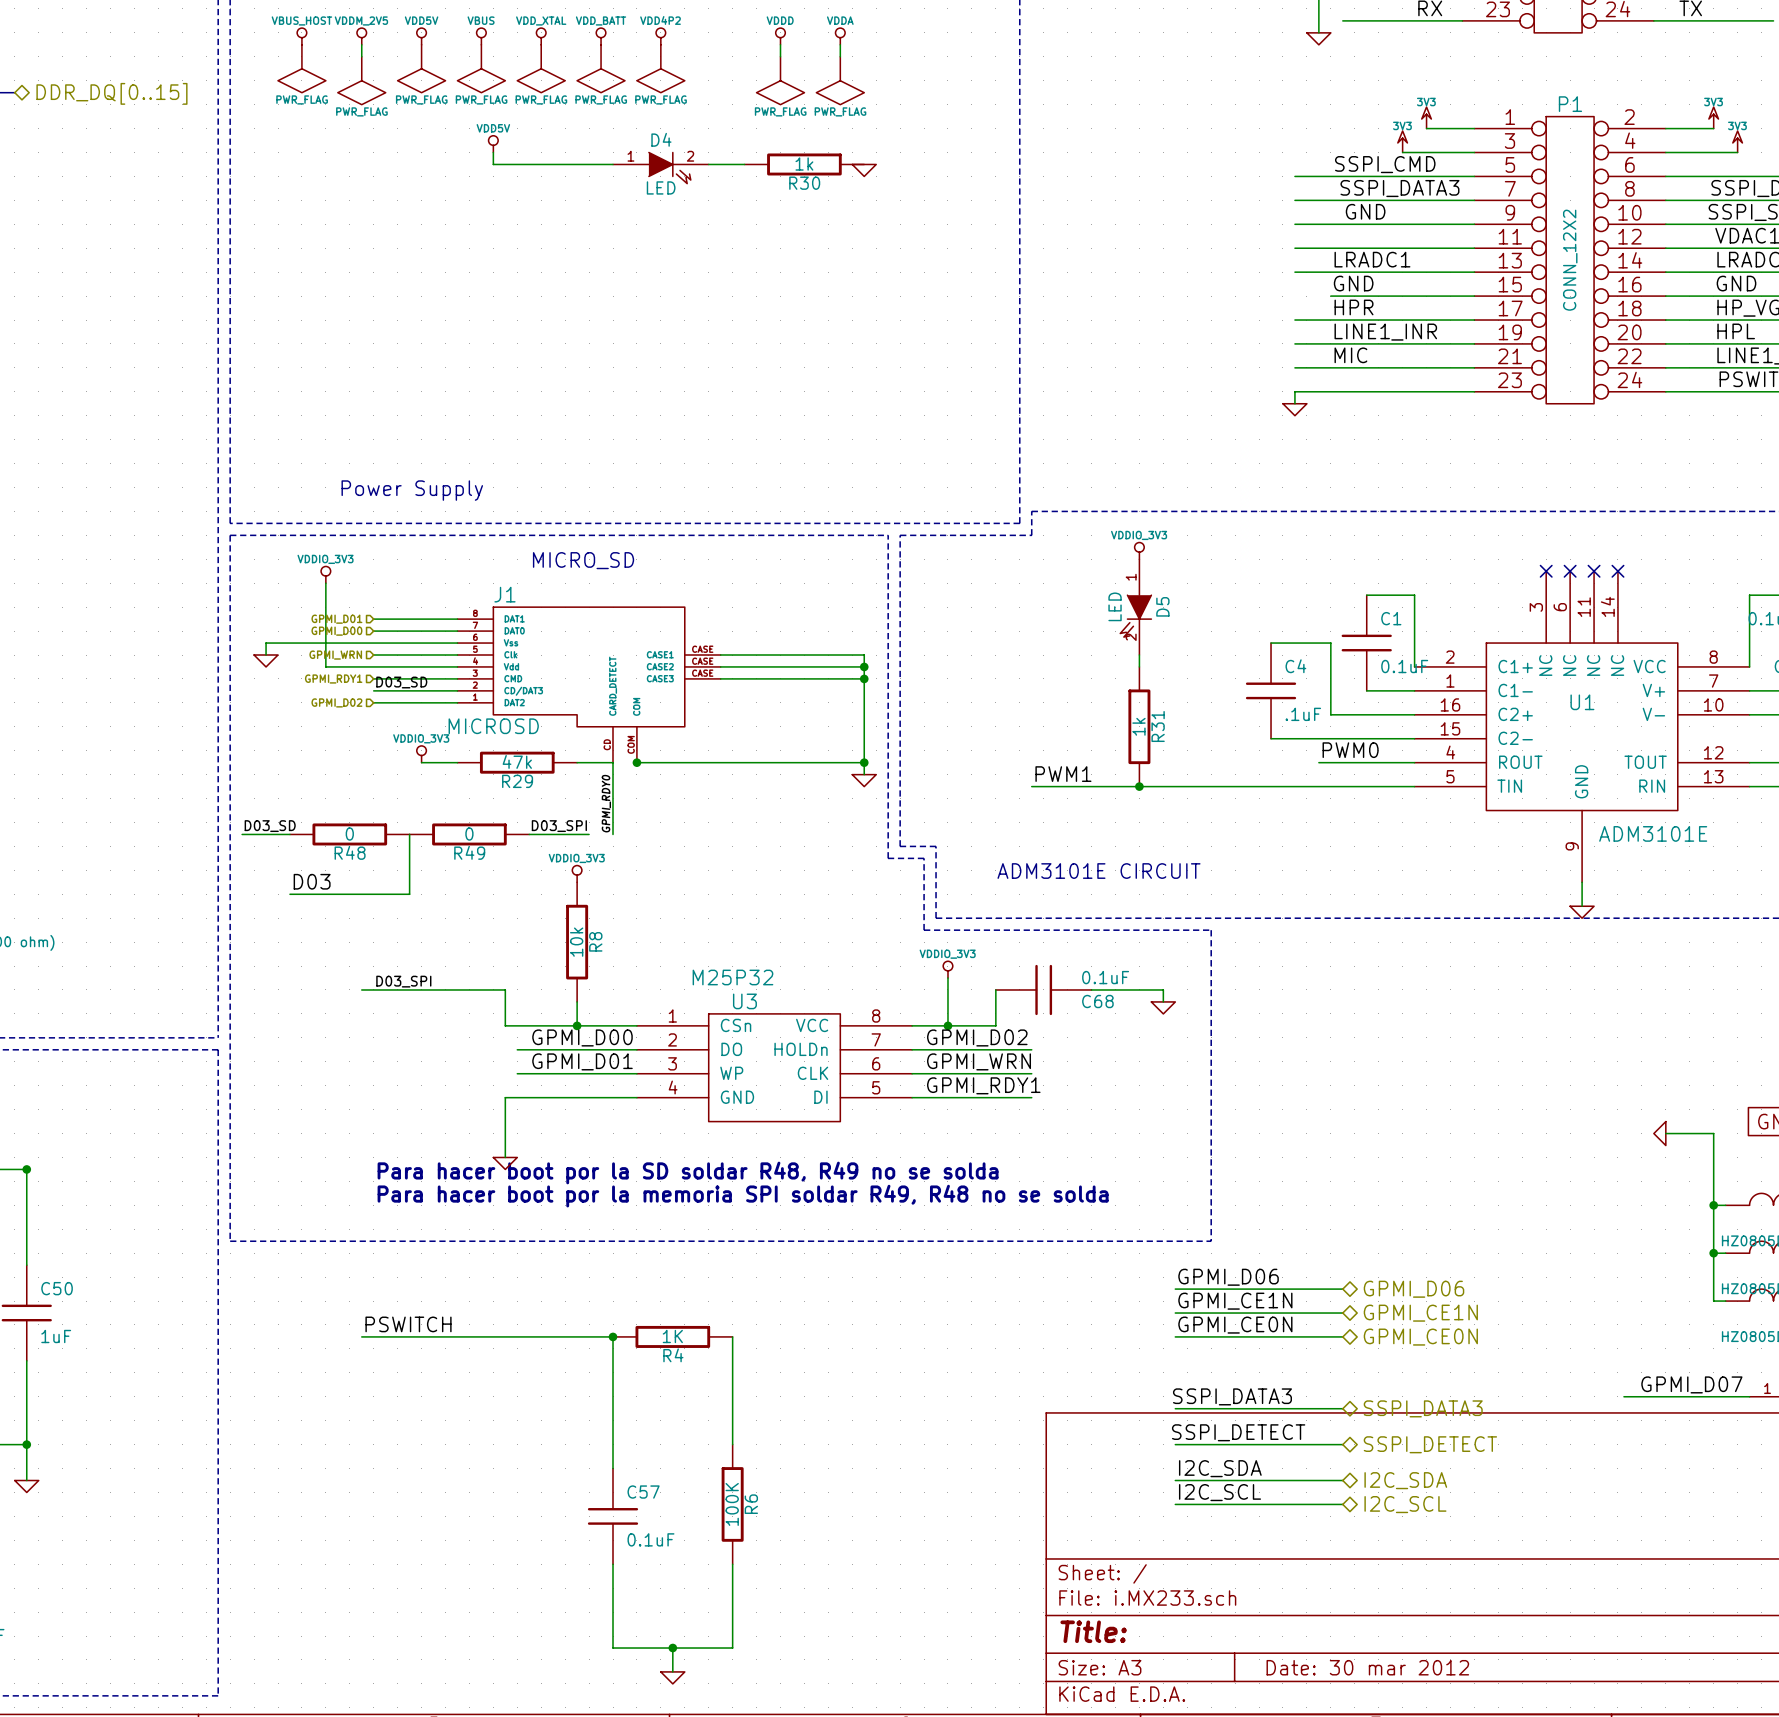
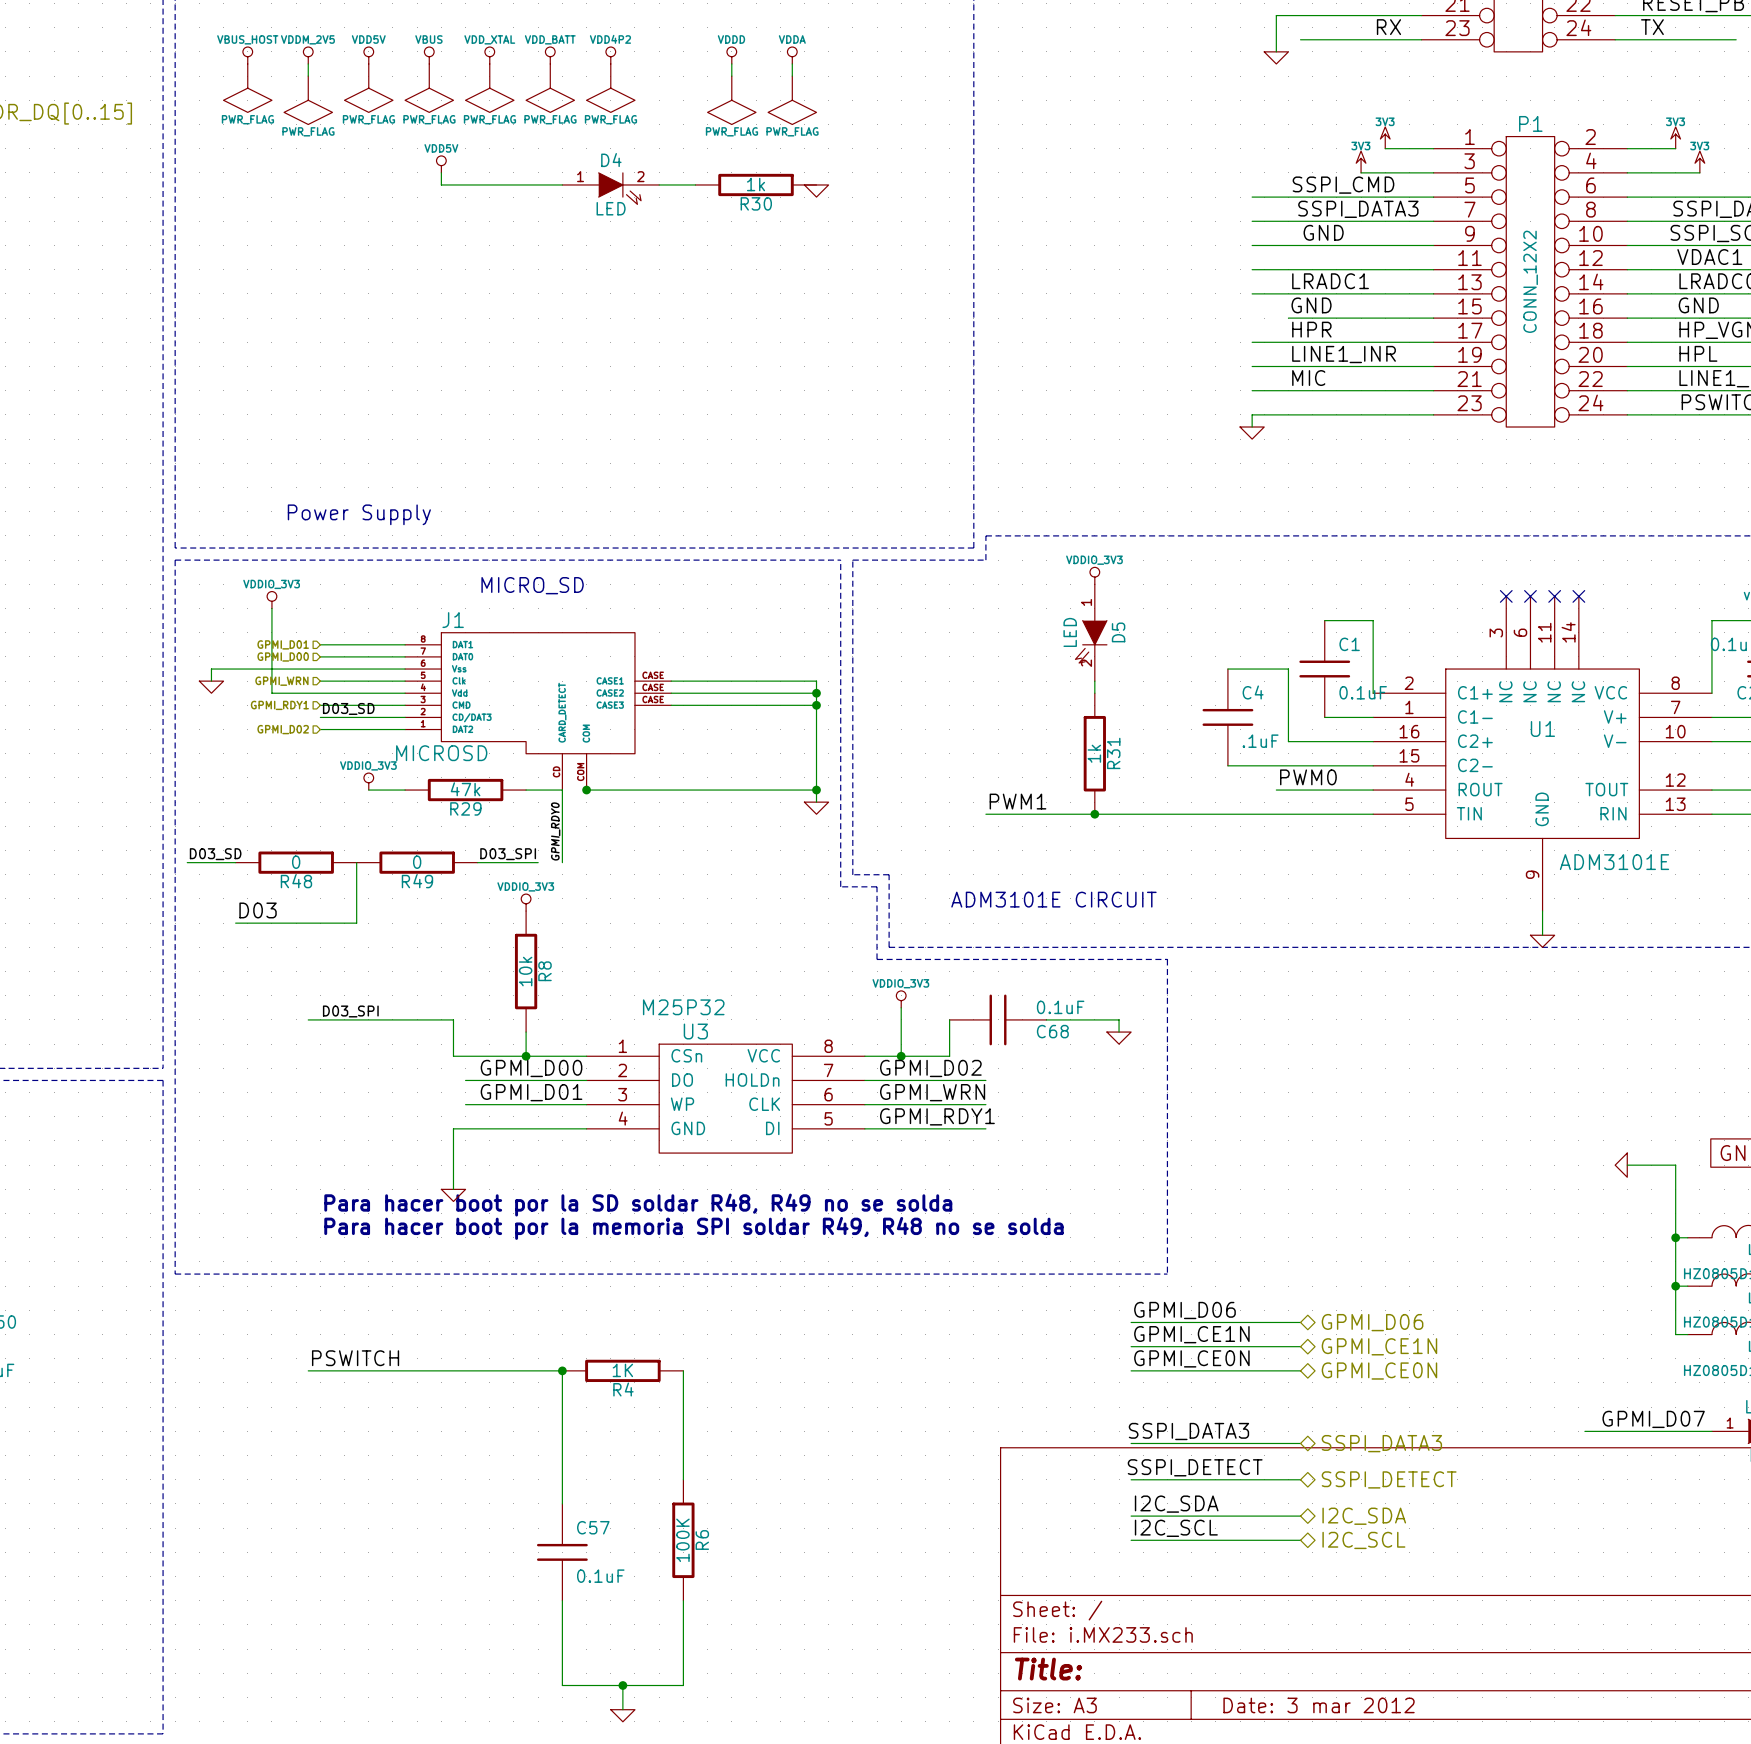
title block: Date: 30 mar 2012 (1367, 1667) -> Date: 3 mar 2012 (1319, 1705)

